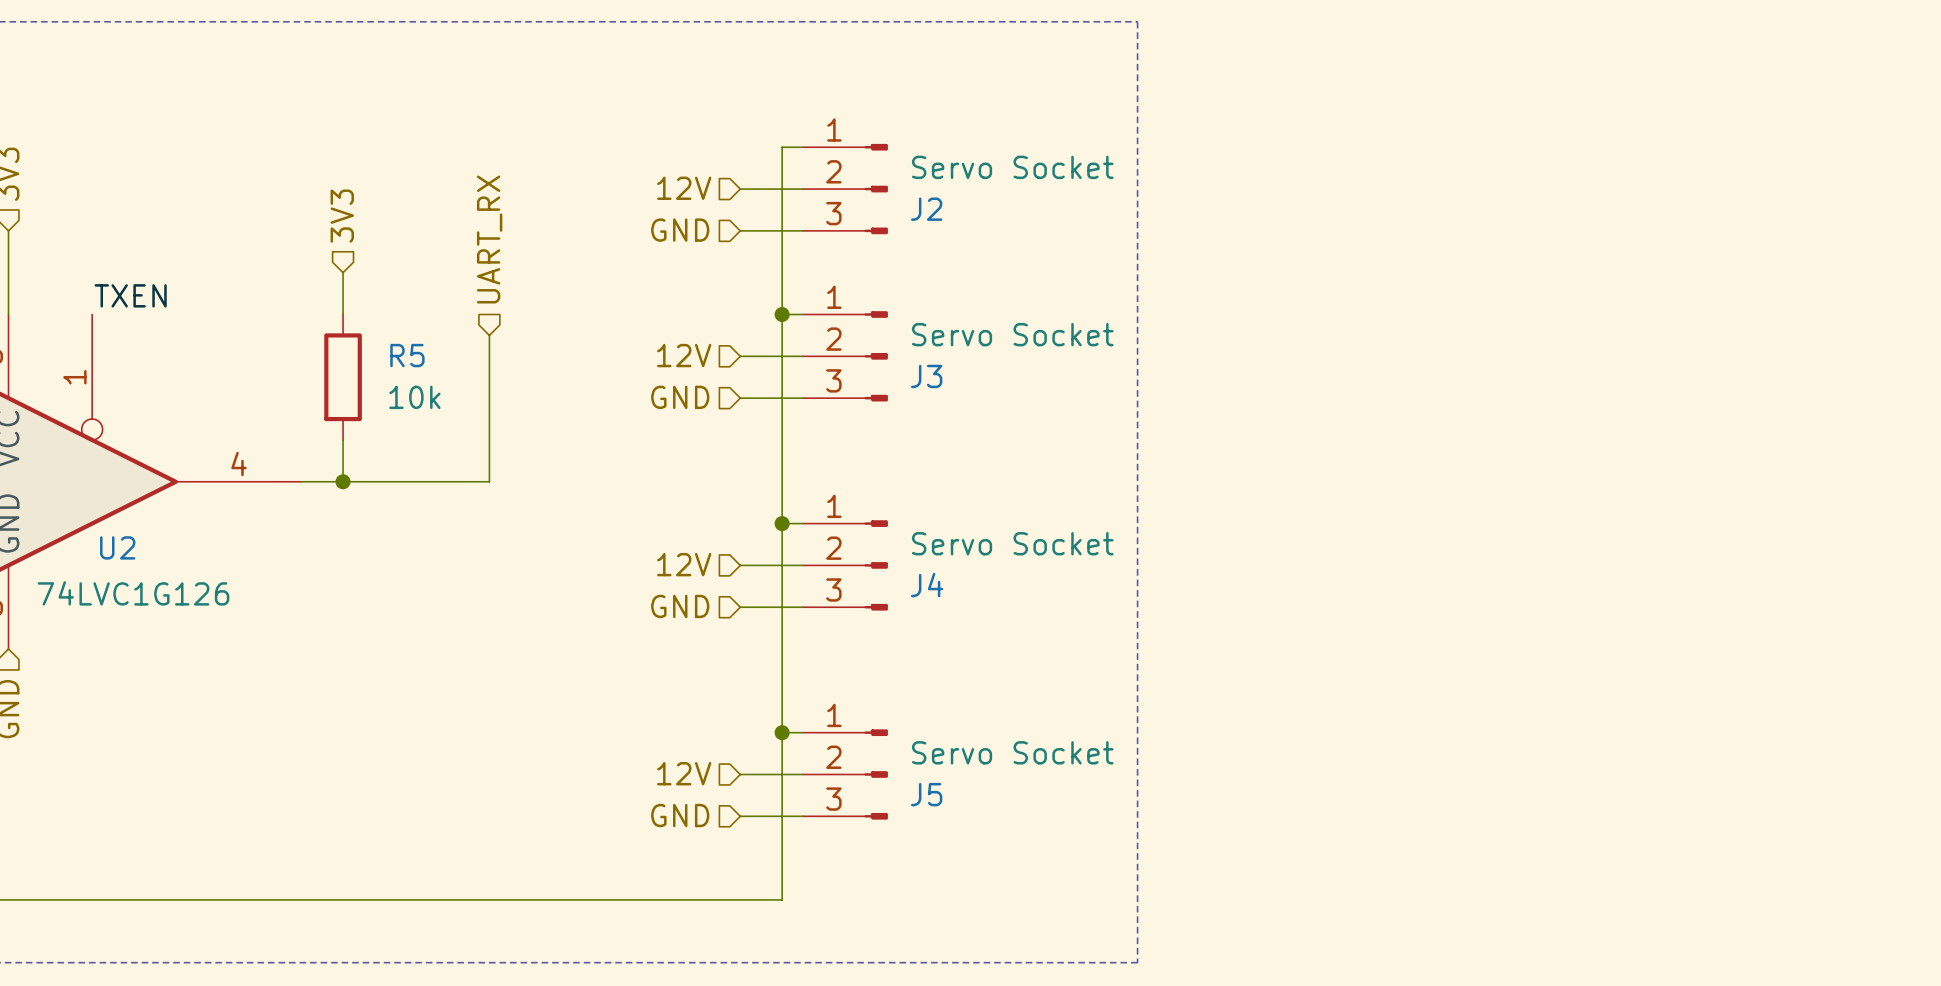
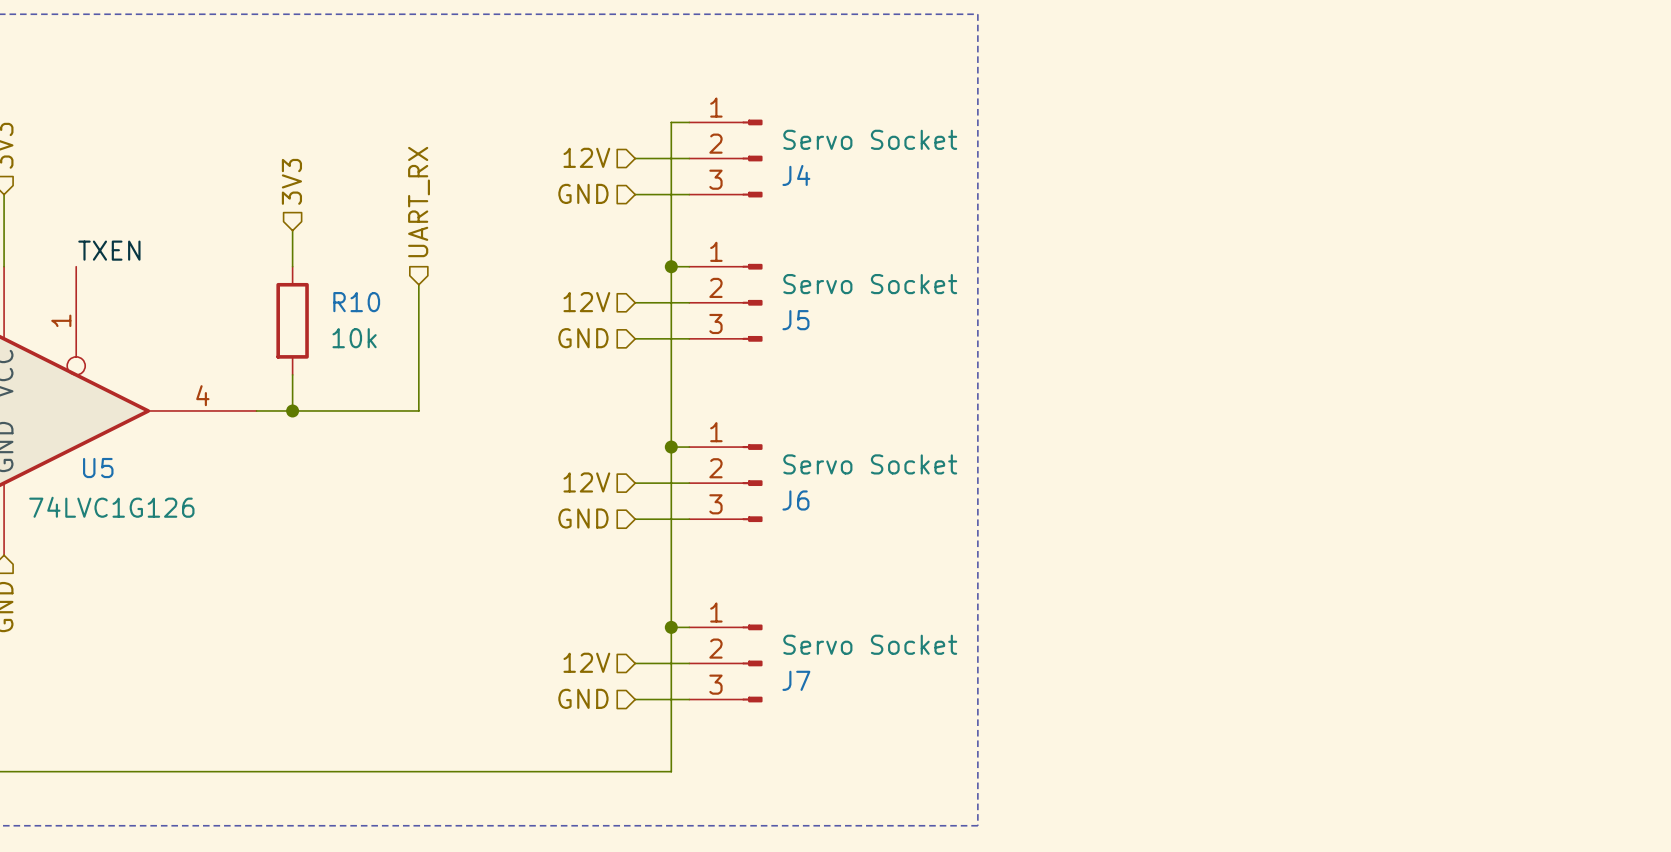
J2 name: J2 (926, 209) -> J4 (796, 175)
R5 name: R5 (407, 355) -> R10 (356, 302)
J3 name: J3 (926, 376) -> J5 (795, 320)
U2 name: U2 (117, 547) -> U5 (98, 468)
J4 name: J4 (927, 585) -> J6 (795, 500)
J5 name: J5 (926, 794) -> J7 (796, 680)

